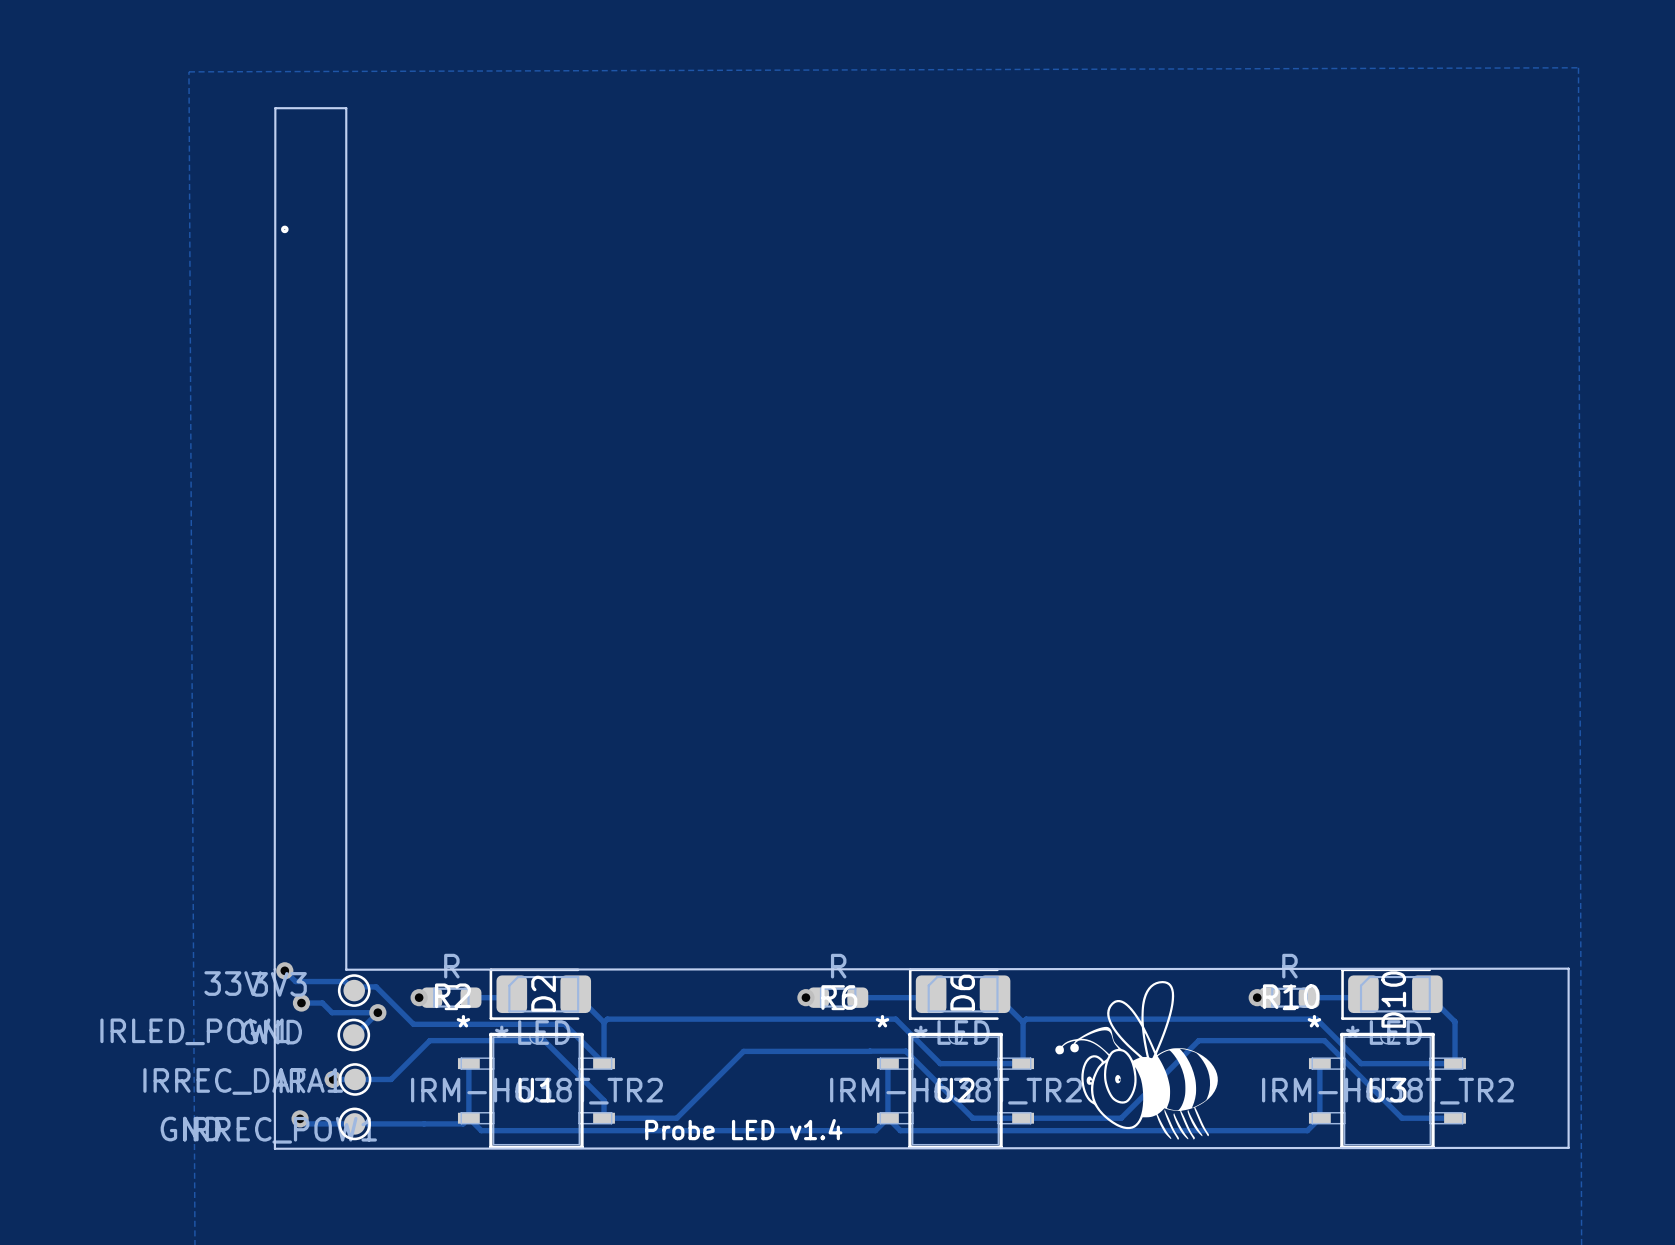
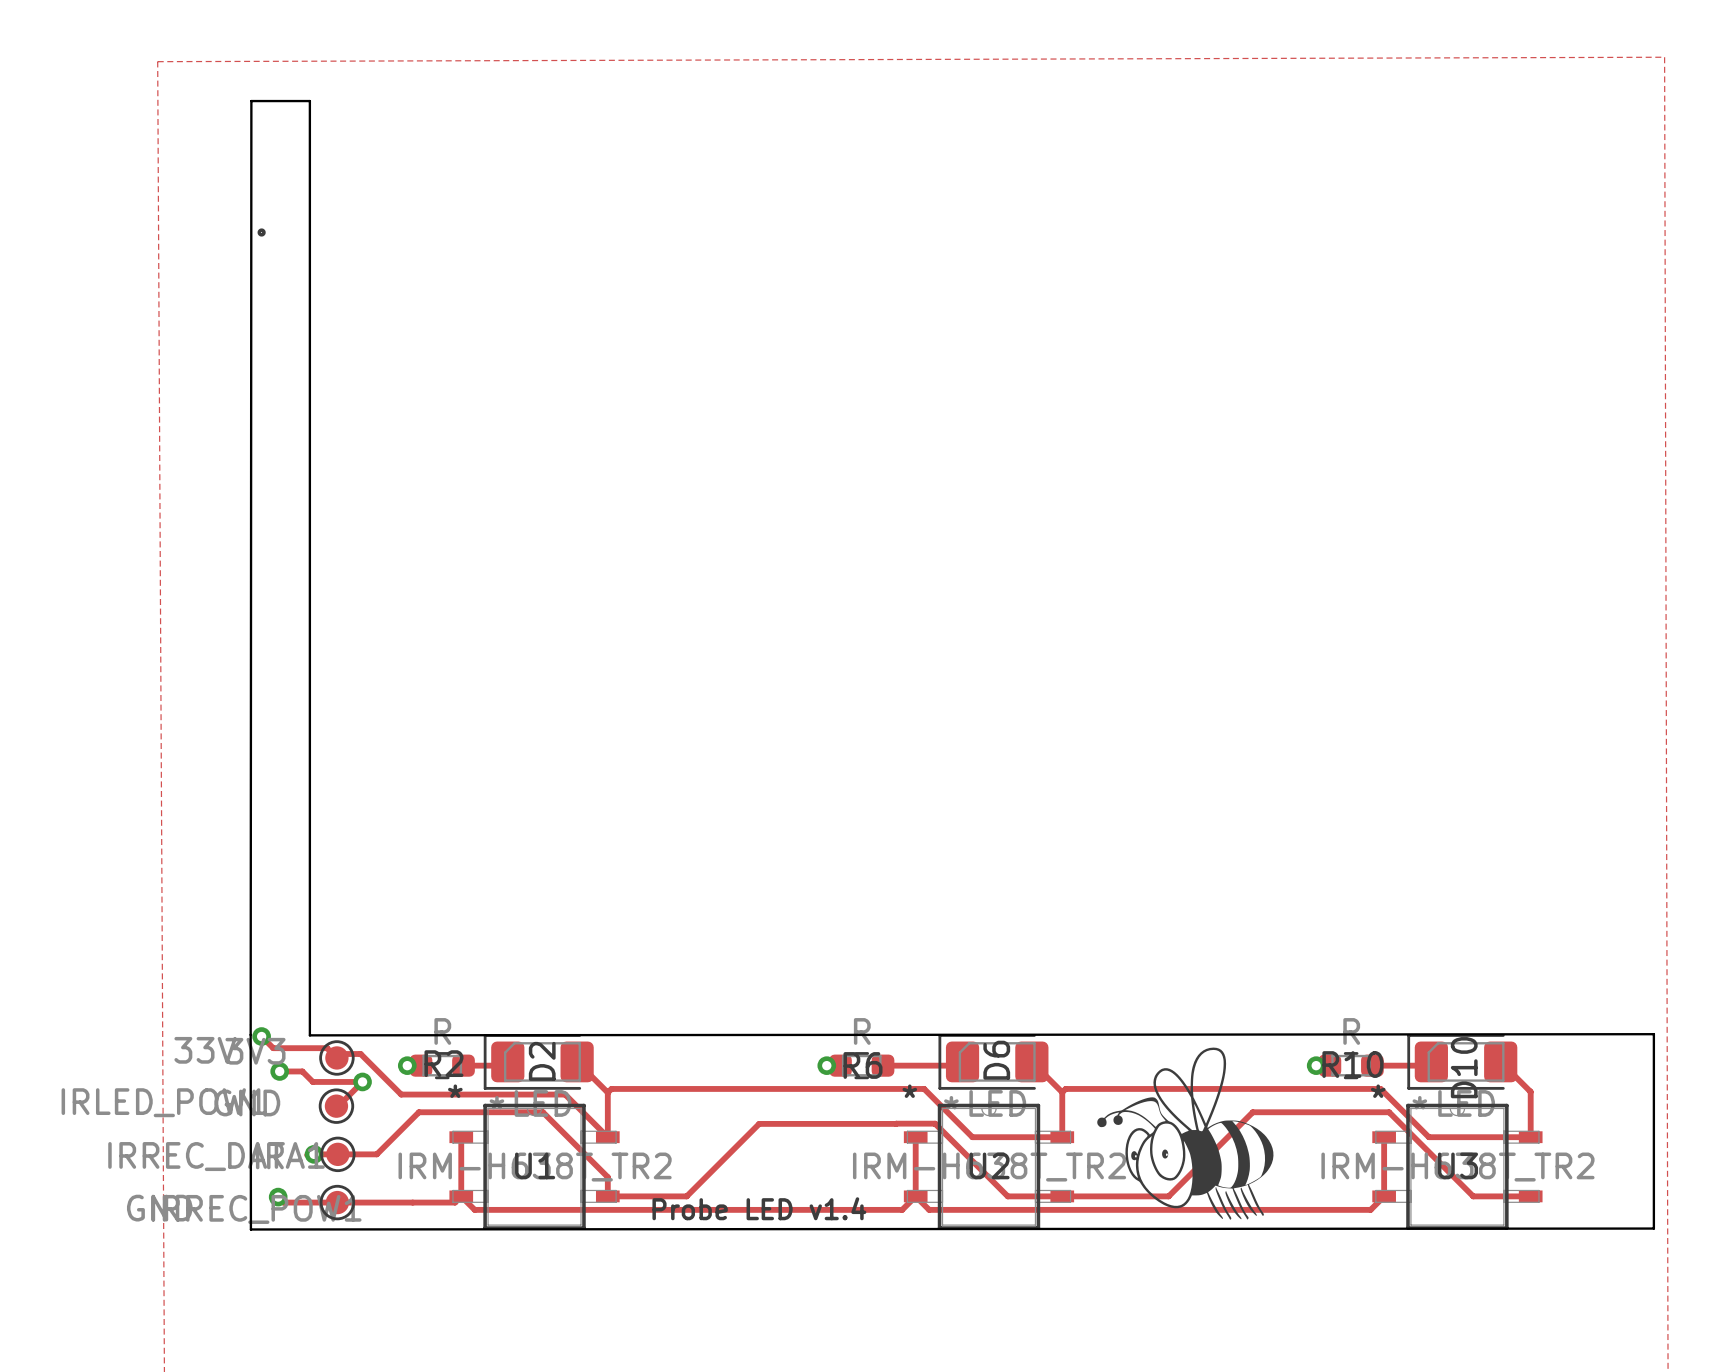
board edge: (329, 108) (346, 108) (346, 969) -> (309, 101) (309, 1035) (328, 1035)

